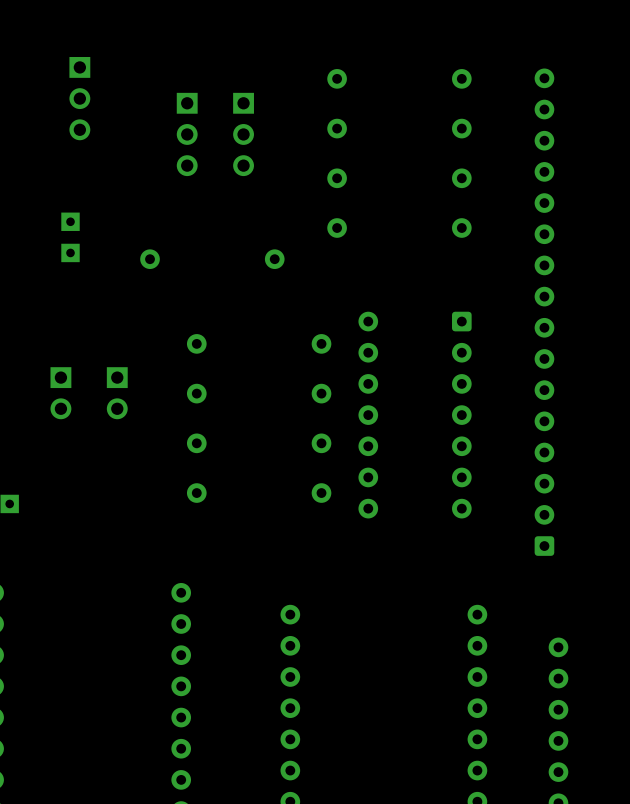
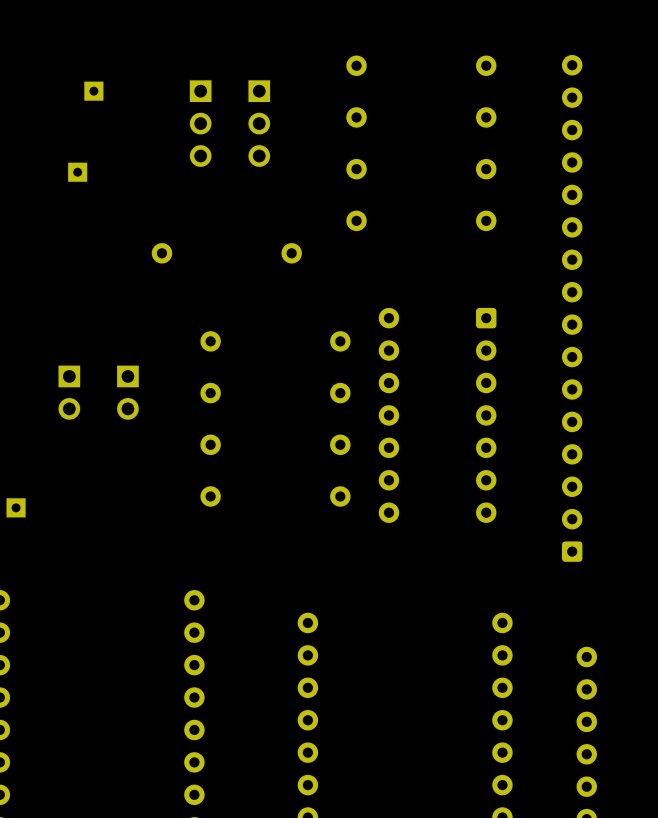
part footprint: [69, 56, 91, 141] -> [84, 81, 104, 101]
part: none -> (77, 172)
part: (70, 221) -> none
part: (70, 252) -> none

